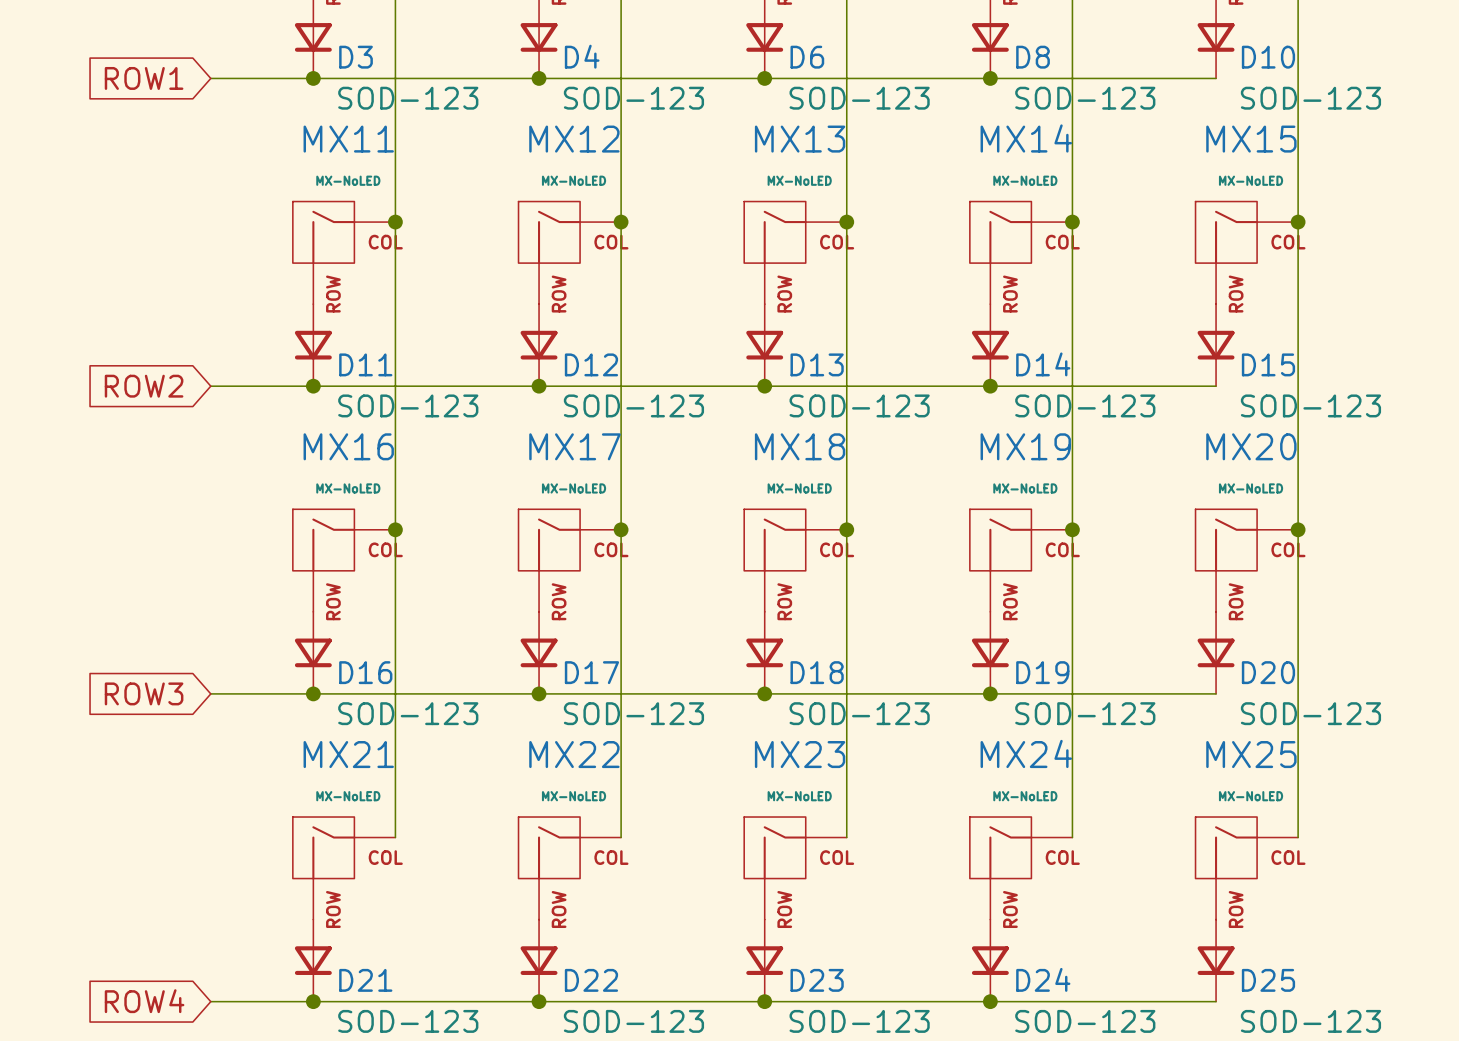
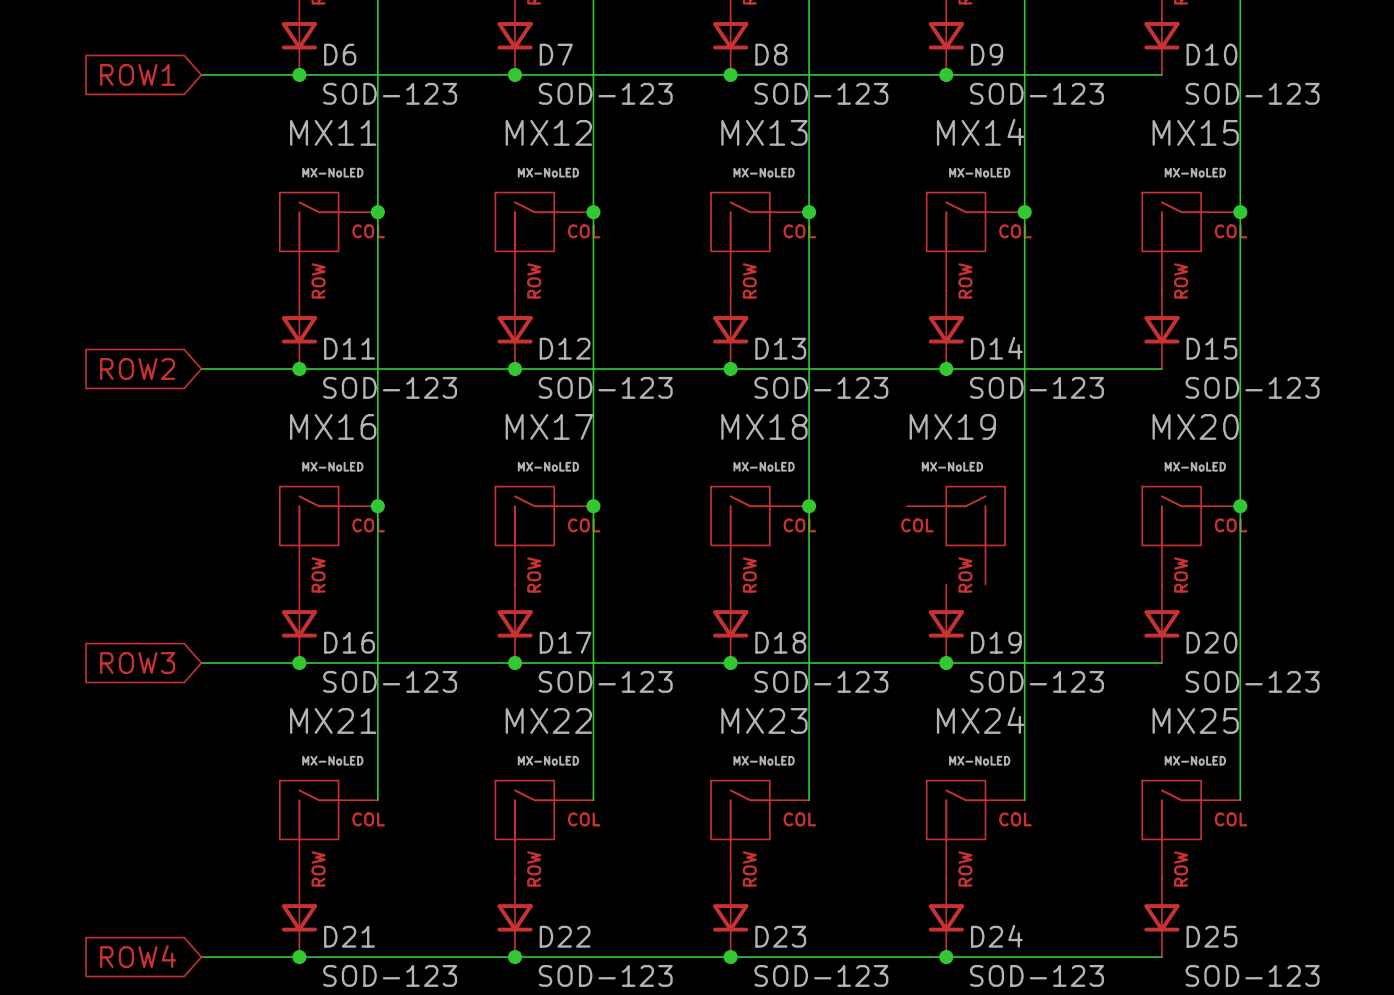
D4 name: D4 (582, 56) -> D7 (556, 54)
D3 name: D3 (356, 57) -> D6 (340, 54)
D6 name: D6 (807, 57) -> D8 (771, 54)
D8 name: D8 (1033, 57) -> D9 (987, 54)
junction: (1072, 529) -> none
MX19 flip: as is (1001, 540) -> left-right (975, 516)

